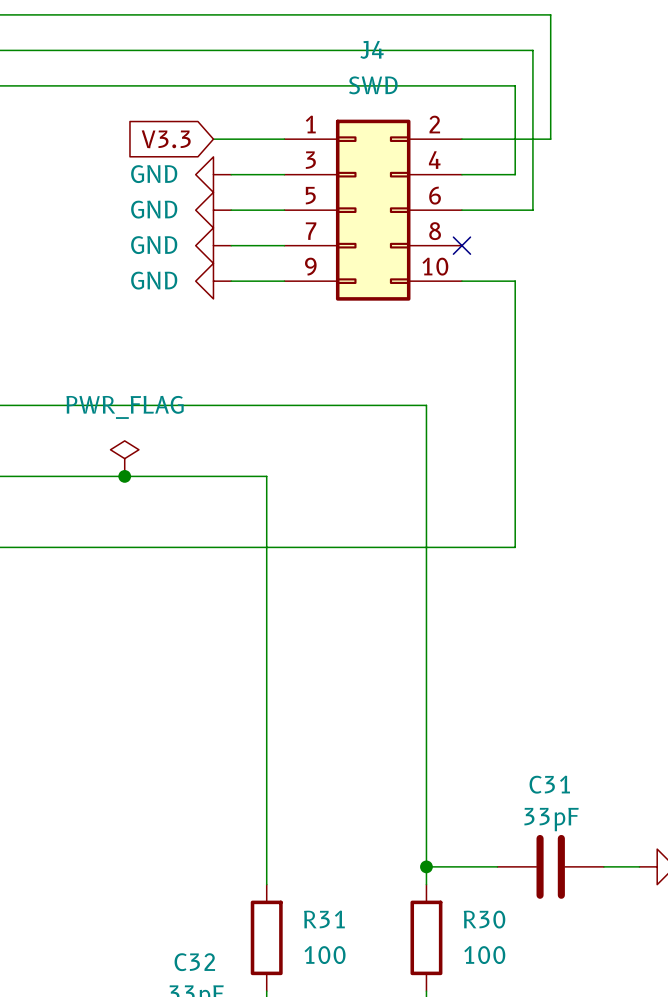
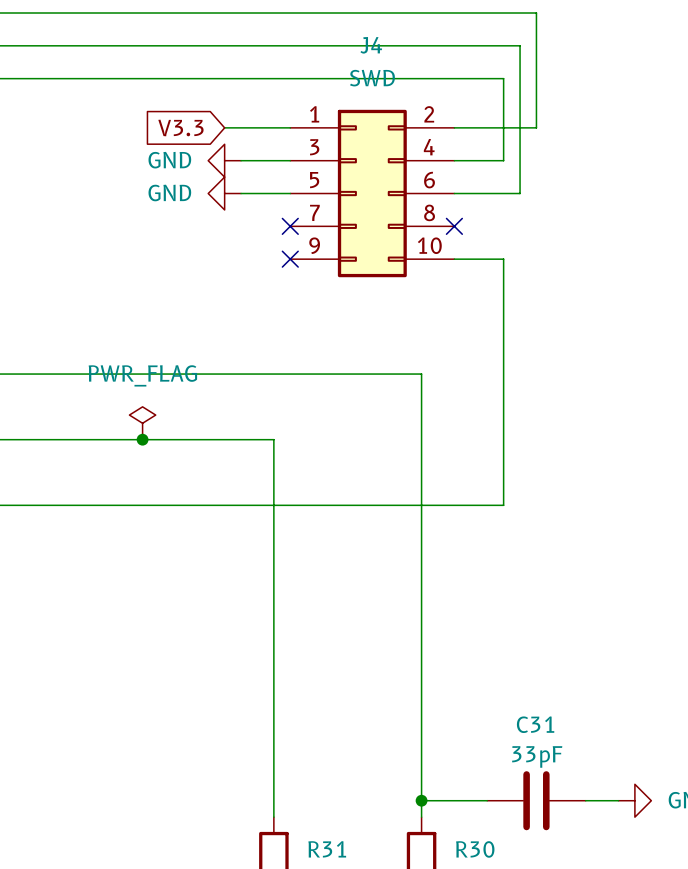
power symbol: GND (213, 245) -> none
wire: (231, 245) (284, 245) -> none
no-connect mark: none -> (290, 226)
power symbol: GND (213, 281) -> none
wire: (231, 281) (284, 281) -> none
no-connect mark: none -> (290, 259)

